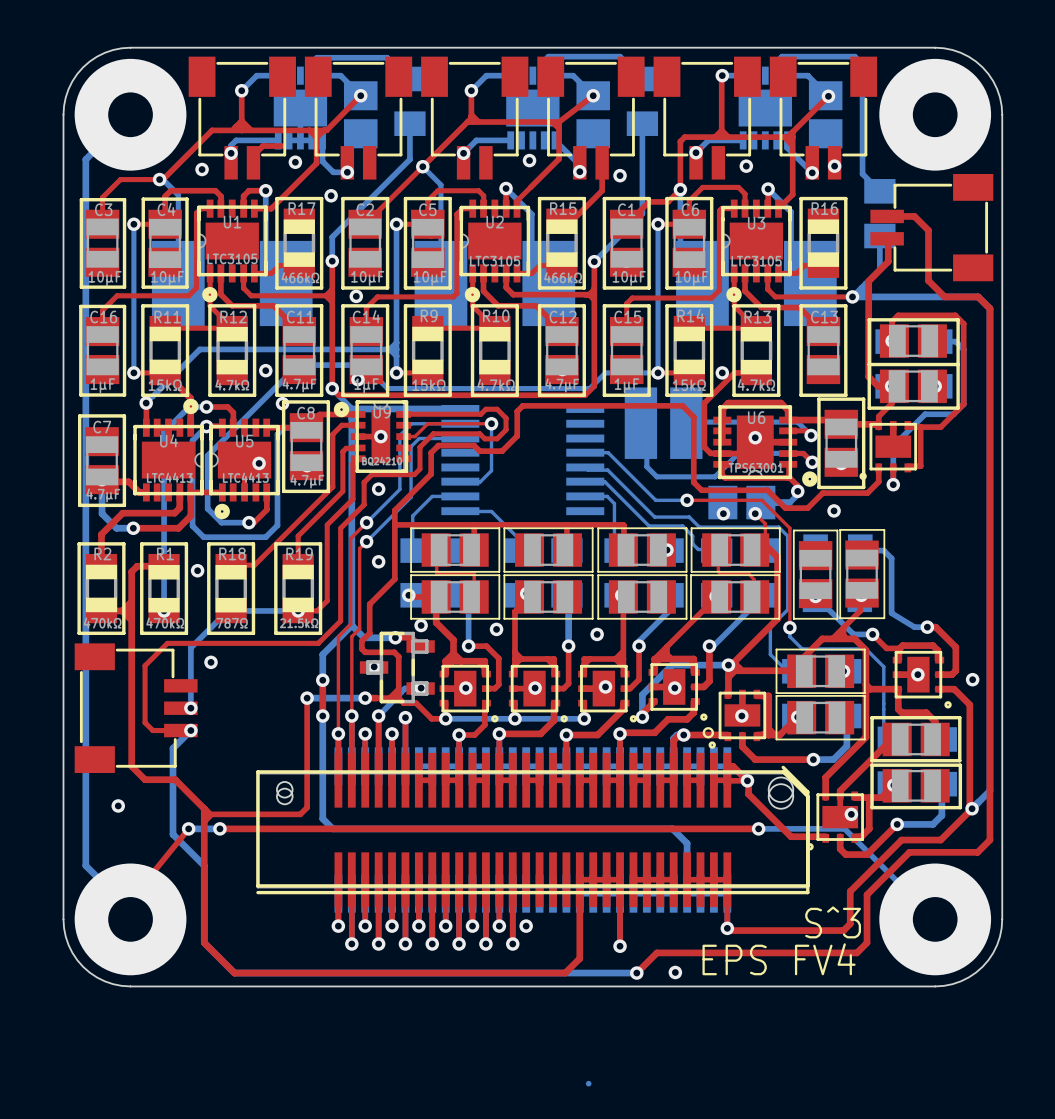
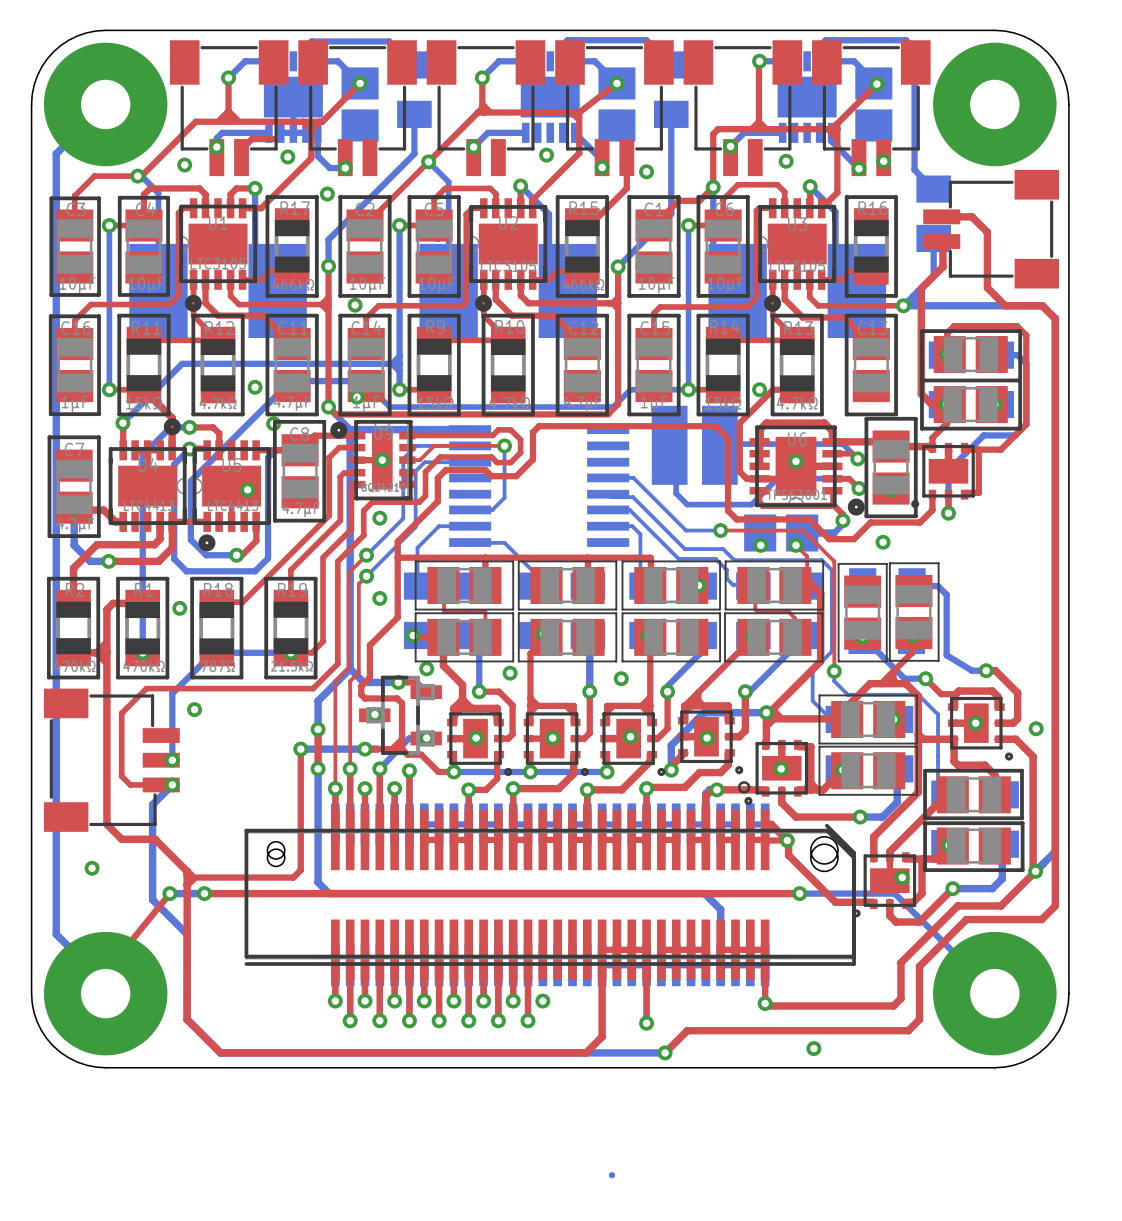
text: S^3 (833, 922) -> none
text: EPS FV4 (779, 959) -> none
via position: (675, 972) -> (813, 1048)

